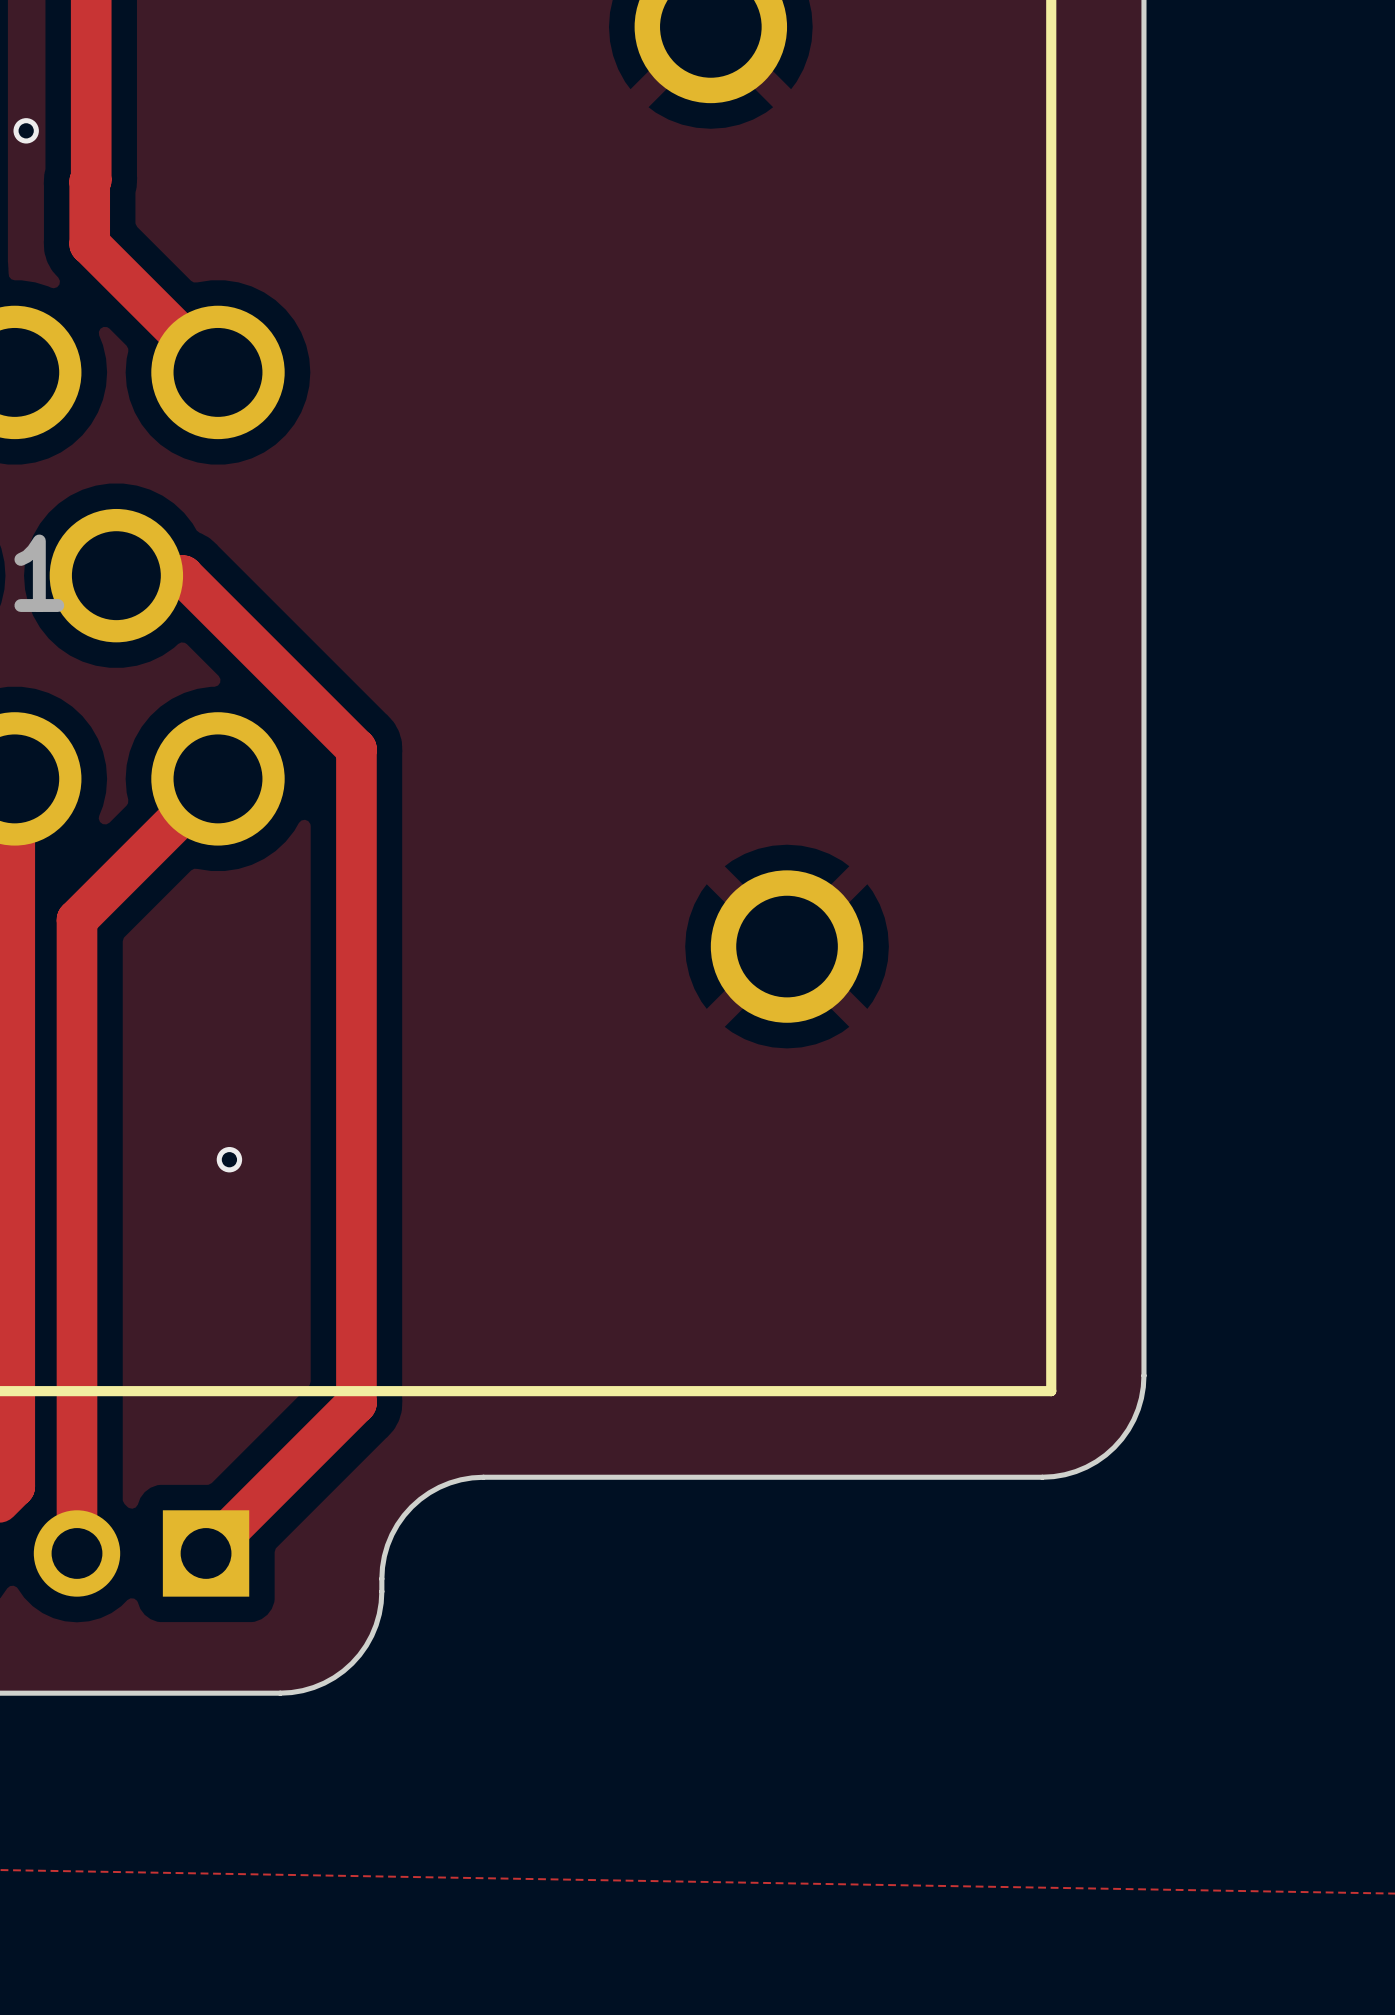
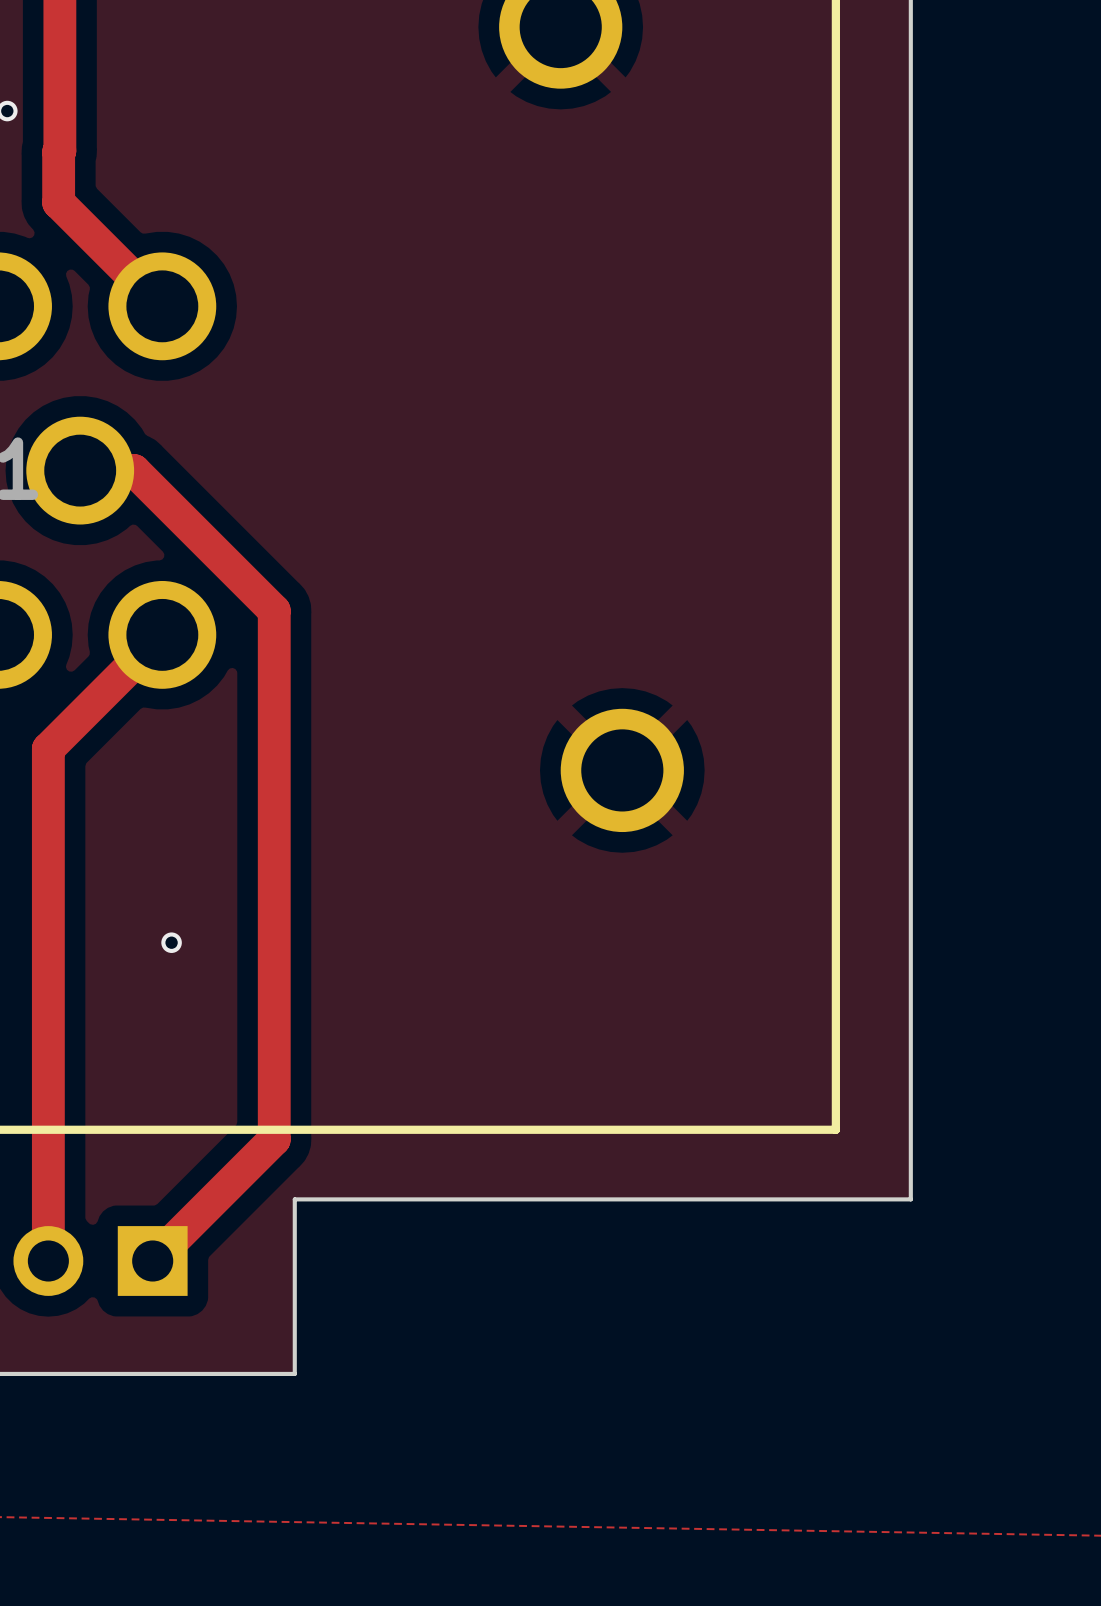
board edge: (1143, 1375) (1141, 1398) (1133, 1419) (1114, 1447) (1086, 1467) (1064, 1474) (1042, 1477) -> (910, 1117) (910, 1199) (828, 1199)
board edge: (483, 1477) (449, 1482) (429, 1492) (411, 1507) (397, 1524) (387, 1545) (381, 1578) -> (376, 1199) (294, 1199) (294, 1281)
board edge: (381, 1591) (379, 1614) (371, 1635) (352, 1663) (324, 1683) (302, 1690) (280, 1693) -> (294, 1291) (294, 1373) (212, 1373)

